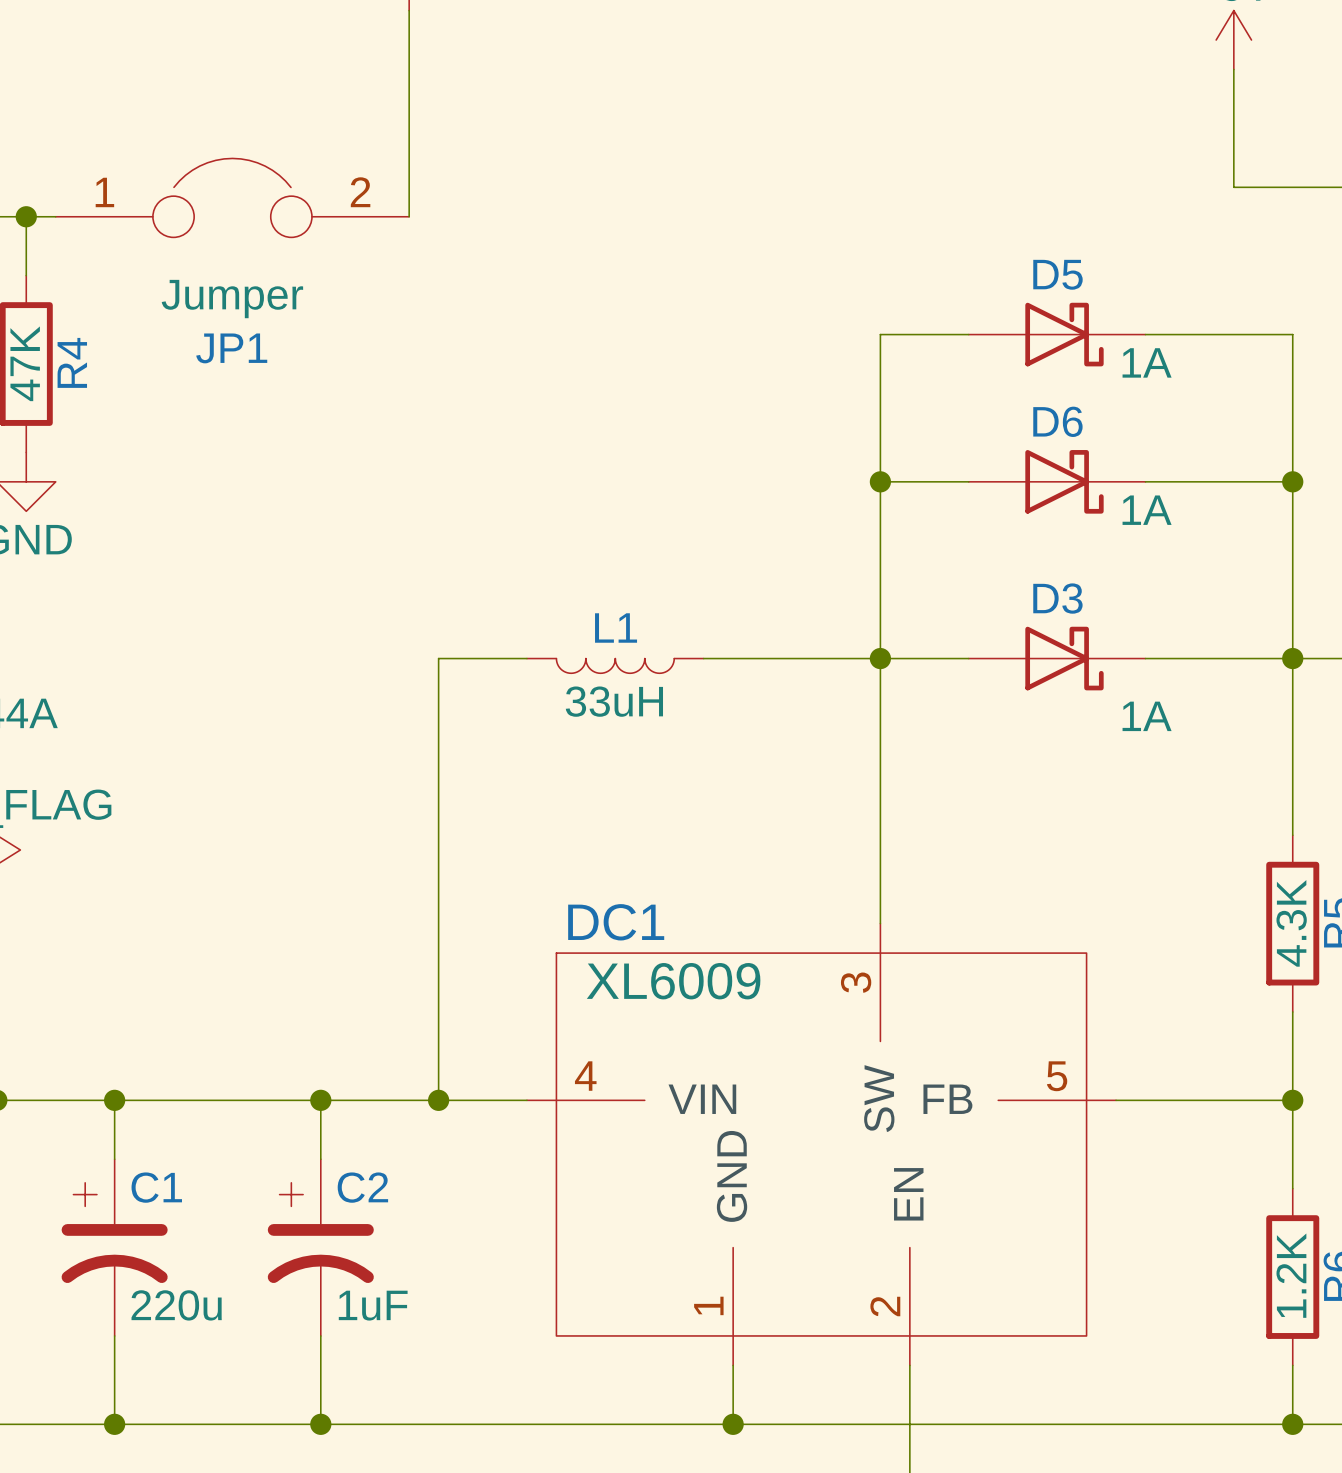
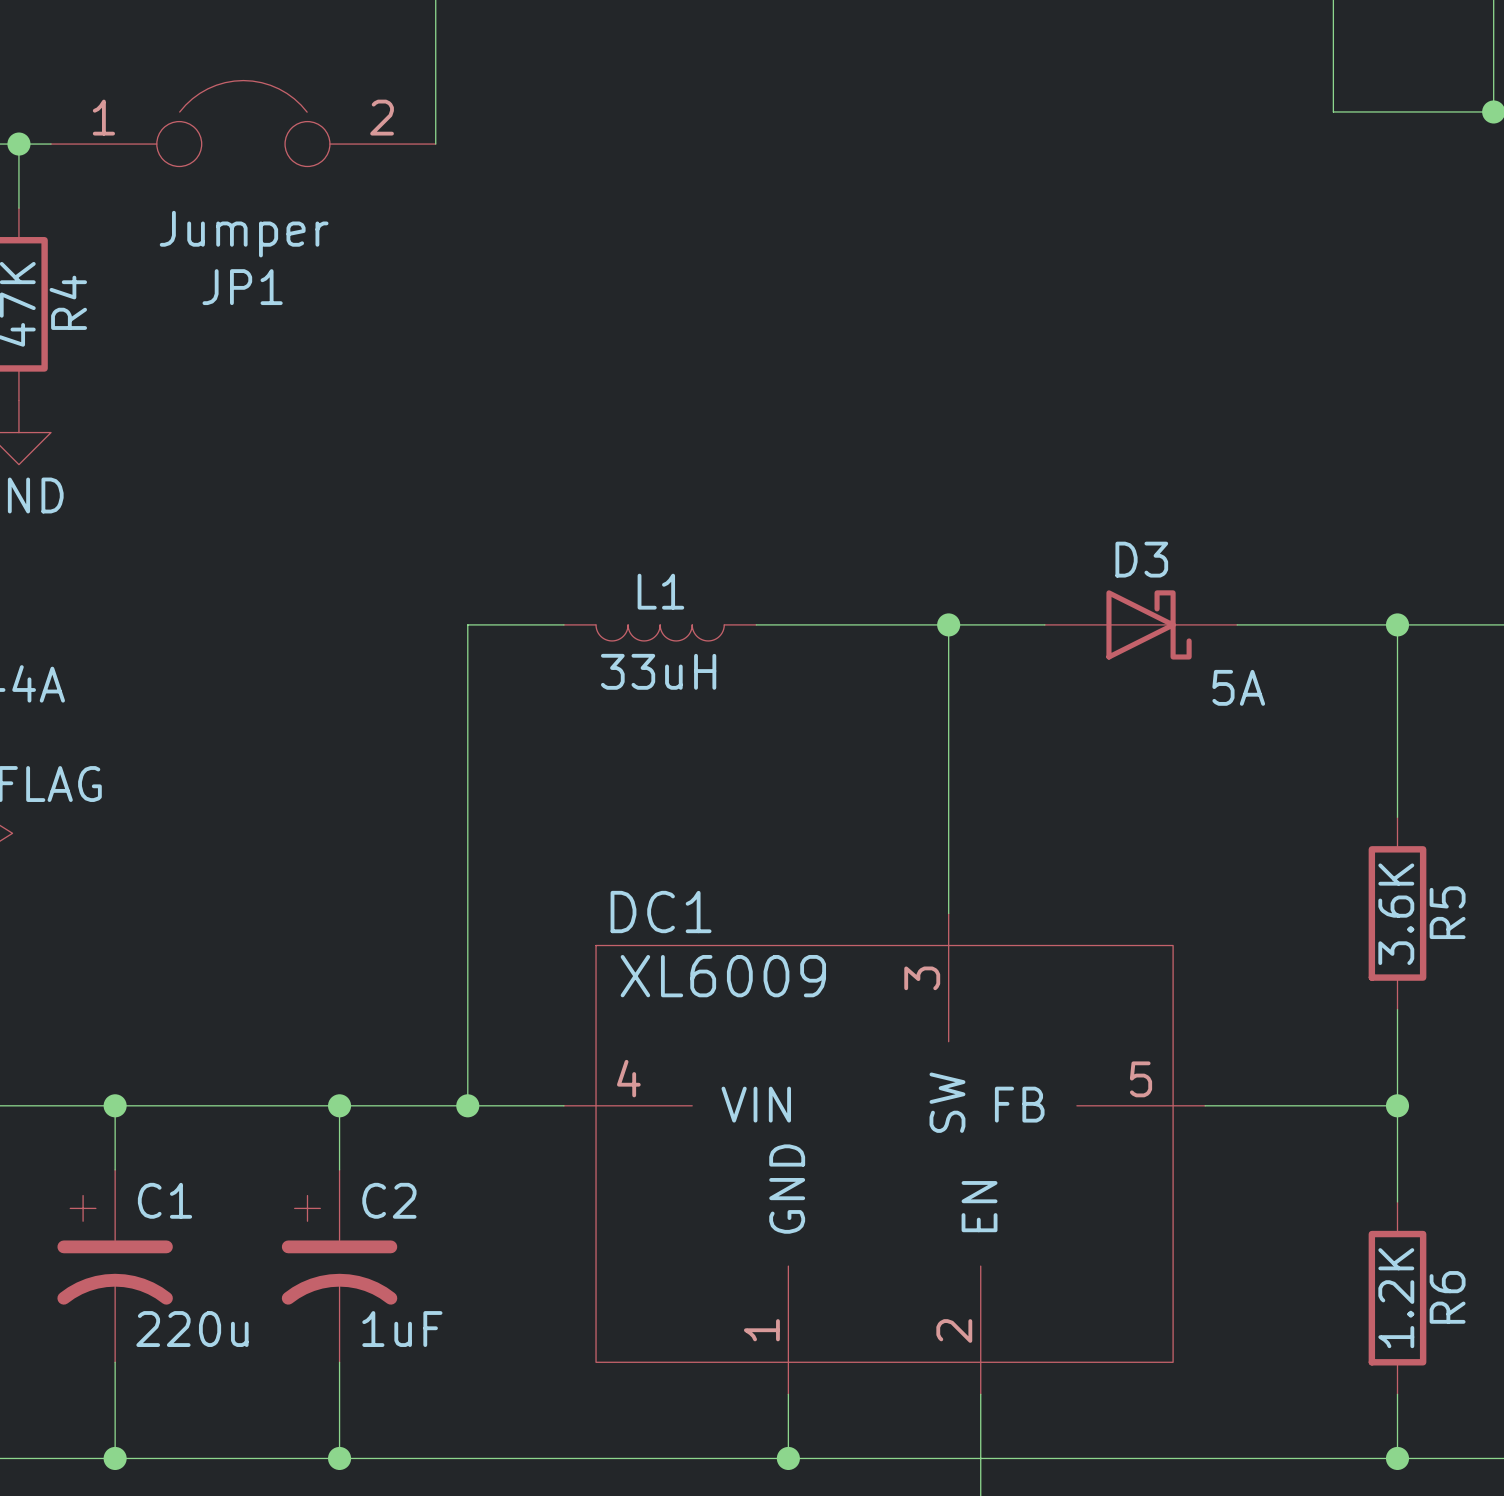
wire: (968, 334) (880, 334) (880, 658) -> none
D5: 1A (1057, 334) -> none
wire: (1145, 334) (1292, 334) (1292, 658) -> none
wire: (880, 481) (968, 481) -> none
junction: (880, 481) -> none
D6: 1A (1057, 481) -> none
wire: (1145, 481) (1292, 481) -> none
junction: (1292, 481) -> none
D3 value: 1A (1147, 716) -> 5A (1238, 687)
R5 value: 4.3K (1291, 923) -> 3.6K (1396, 914)

